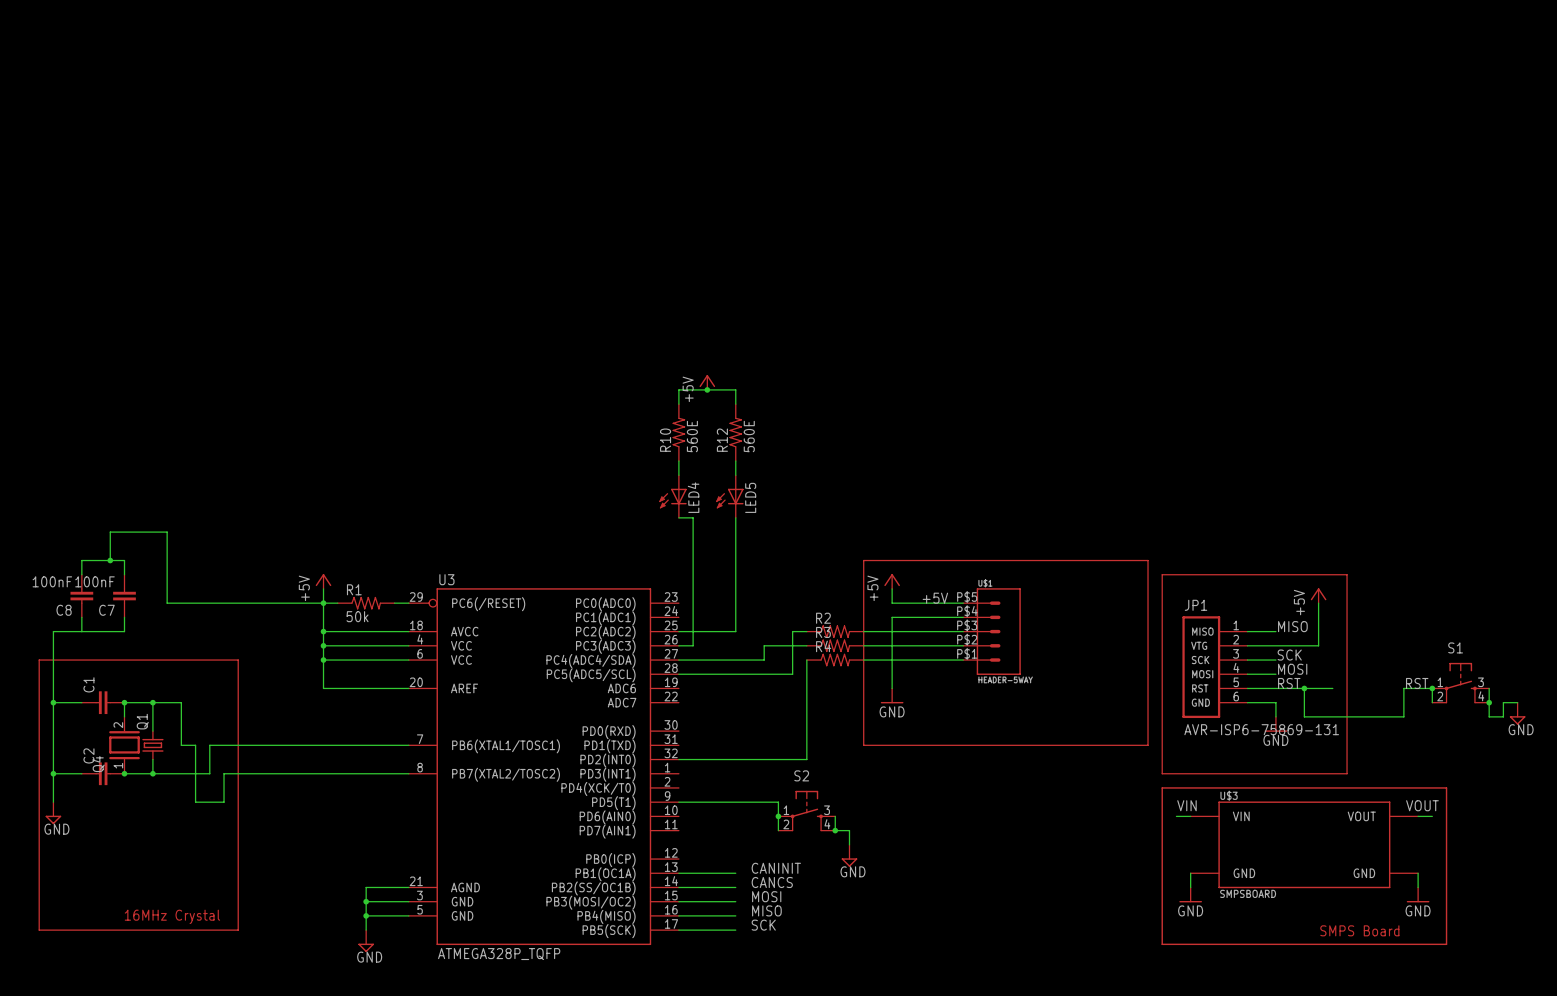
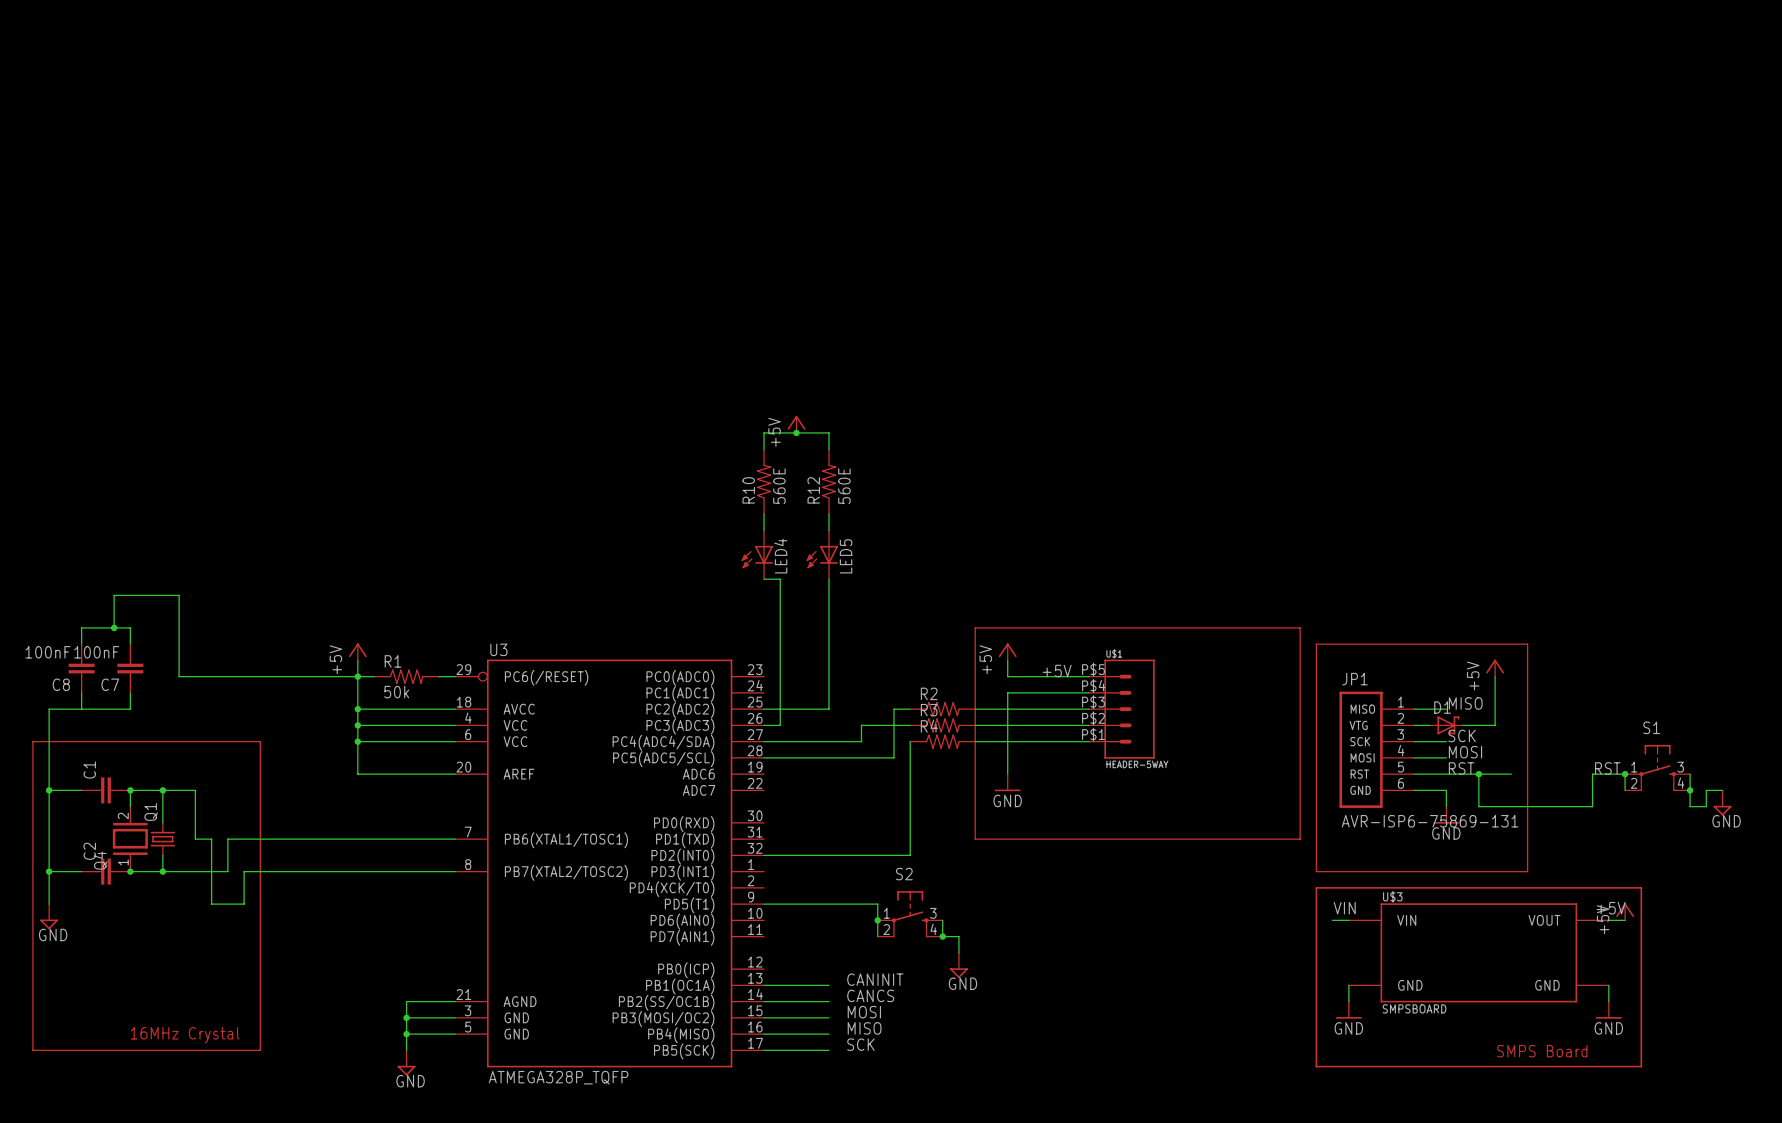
D1: none -> (1446, 725)
label: VOUT (1422, 805) -> +5V (1611, 908)
power symbol: none -> +5V (1625, 911)

